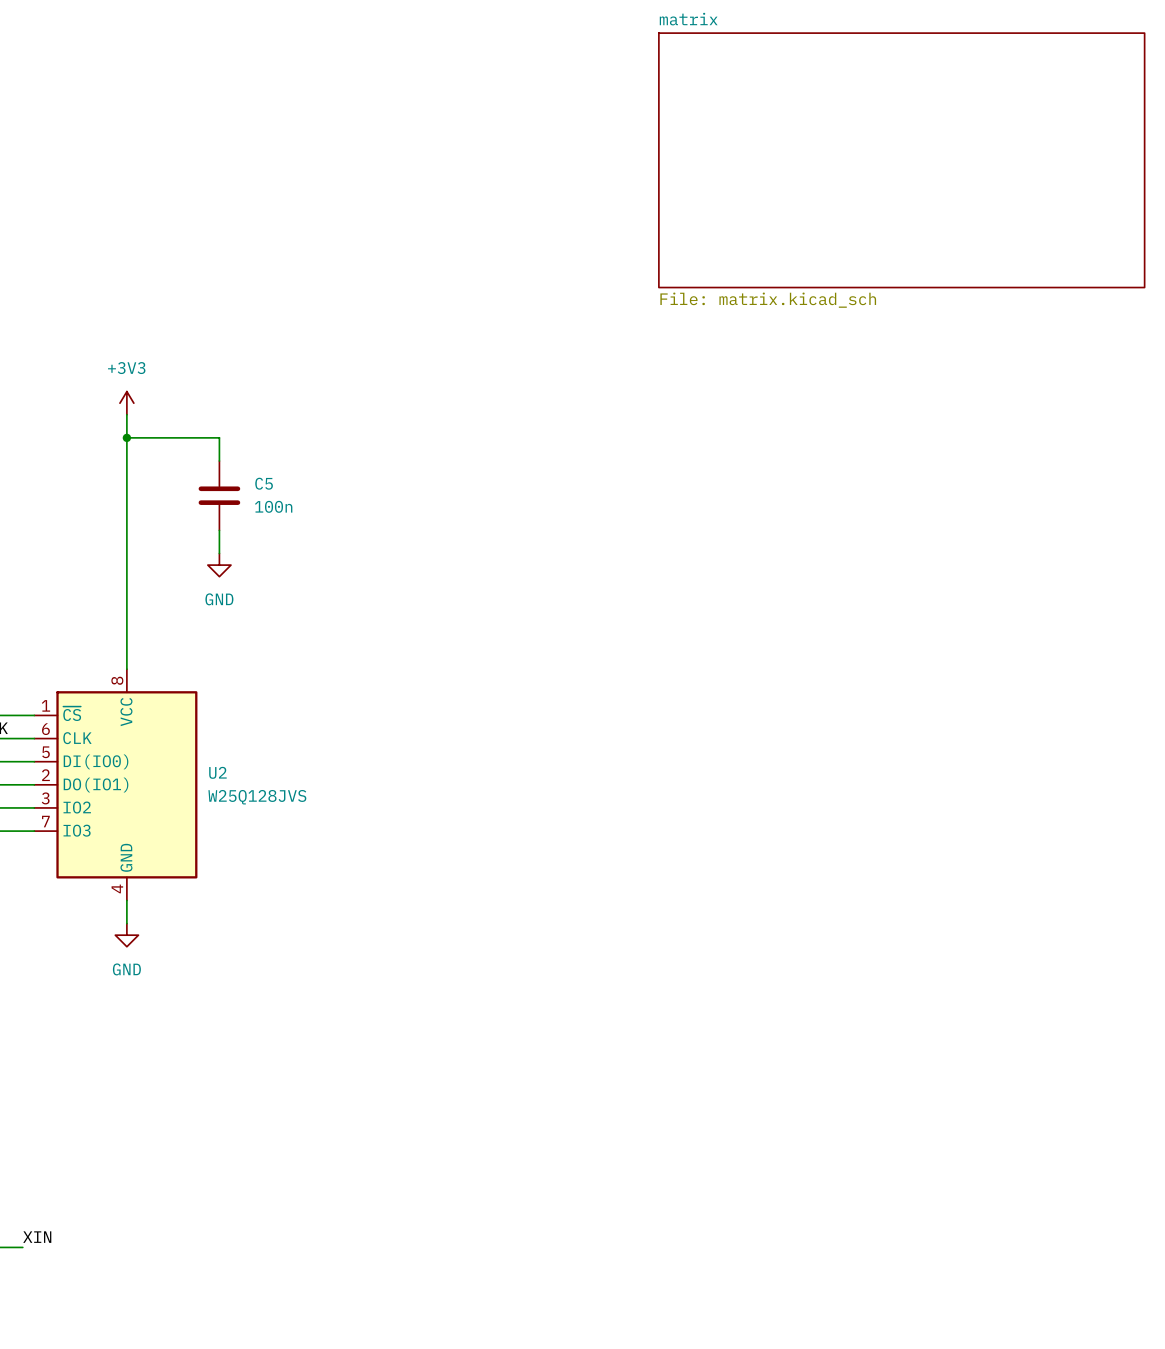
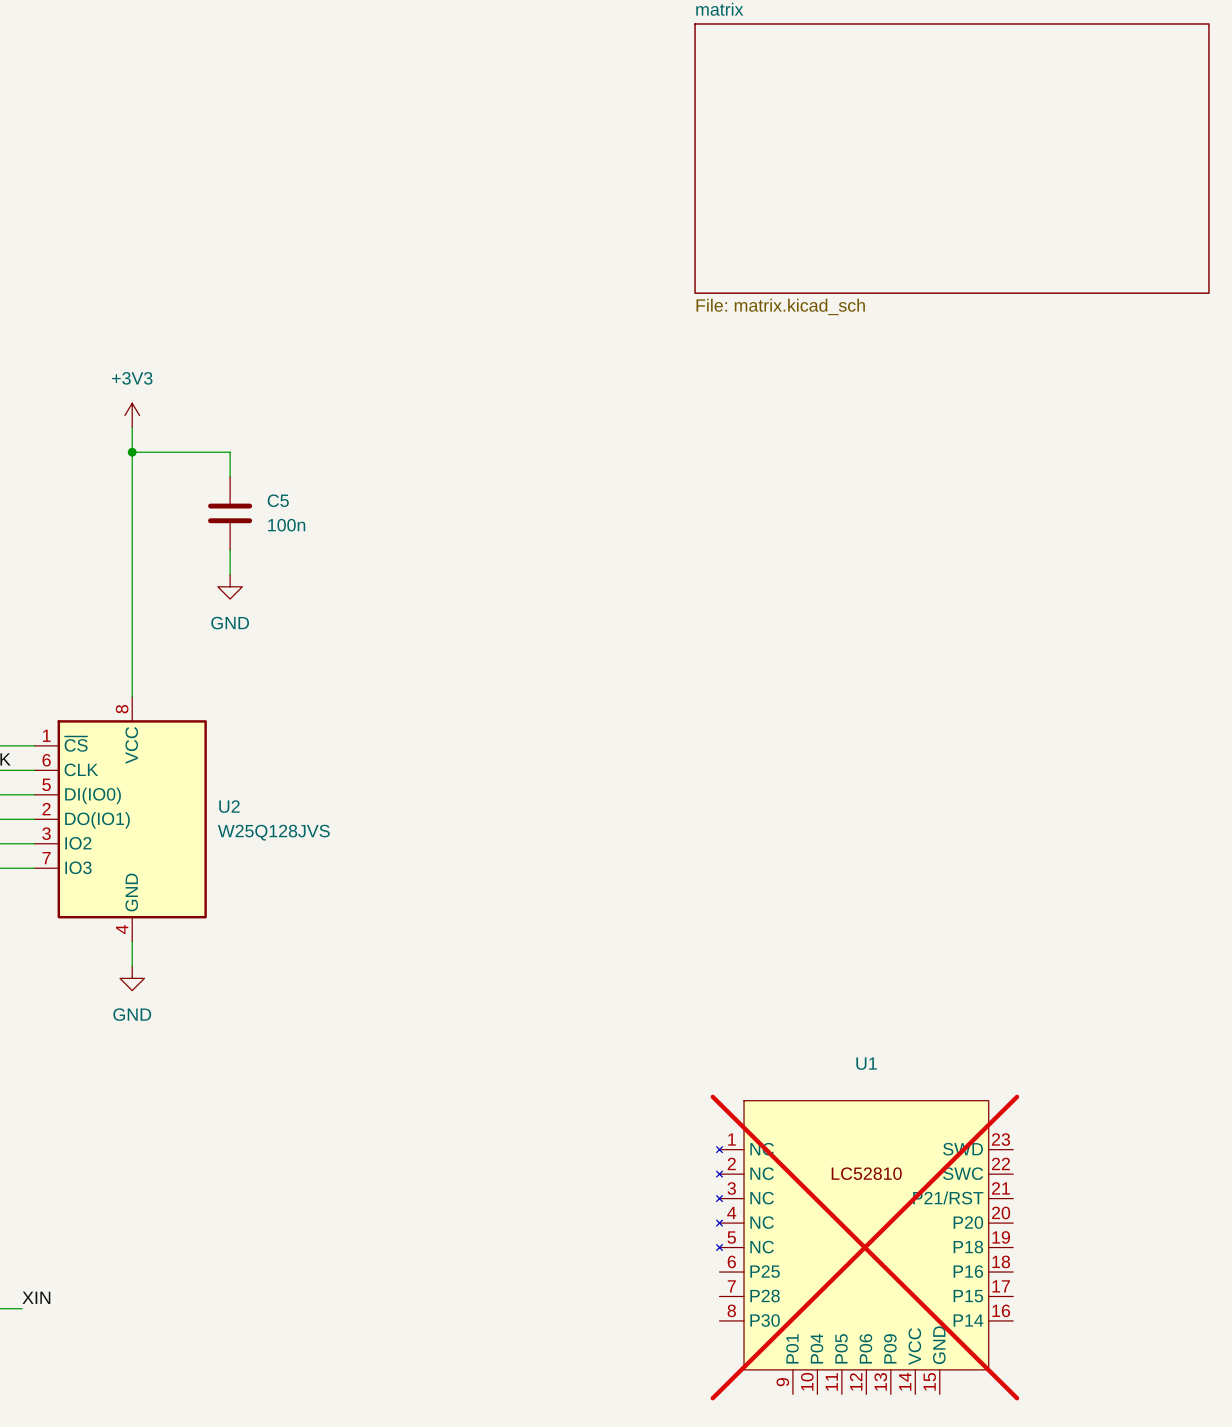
U1: none -> (864, 1247)

